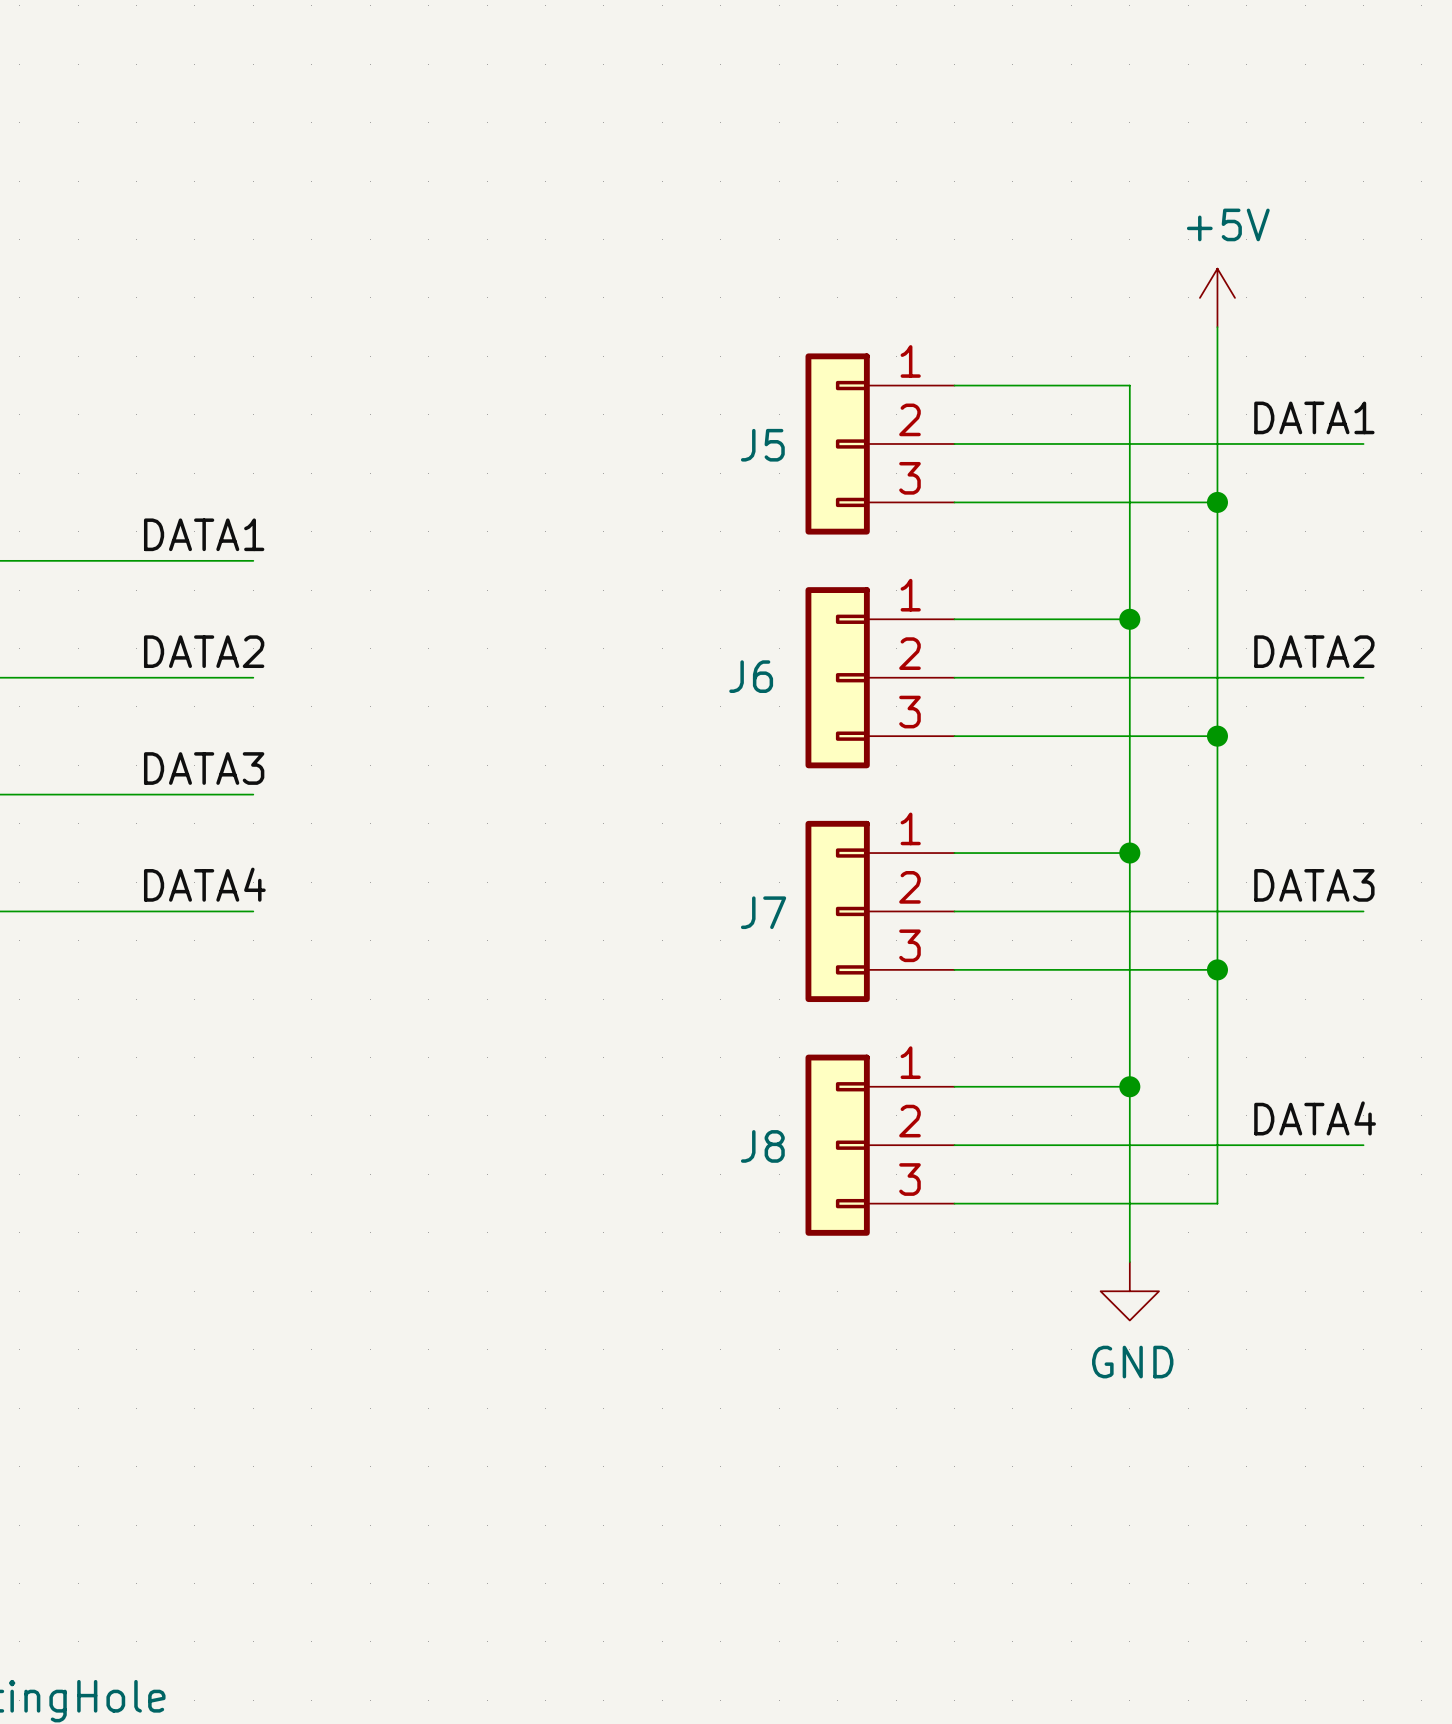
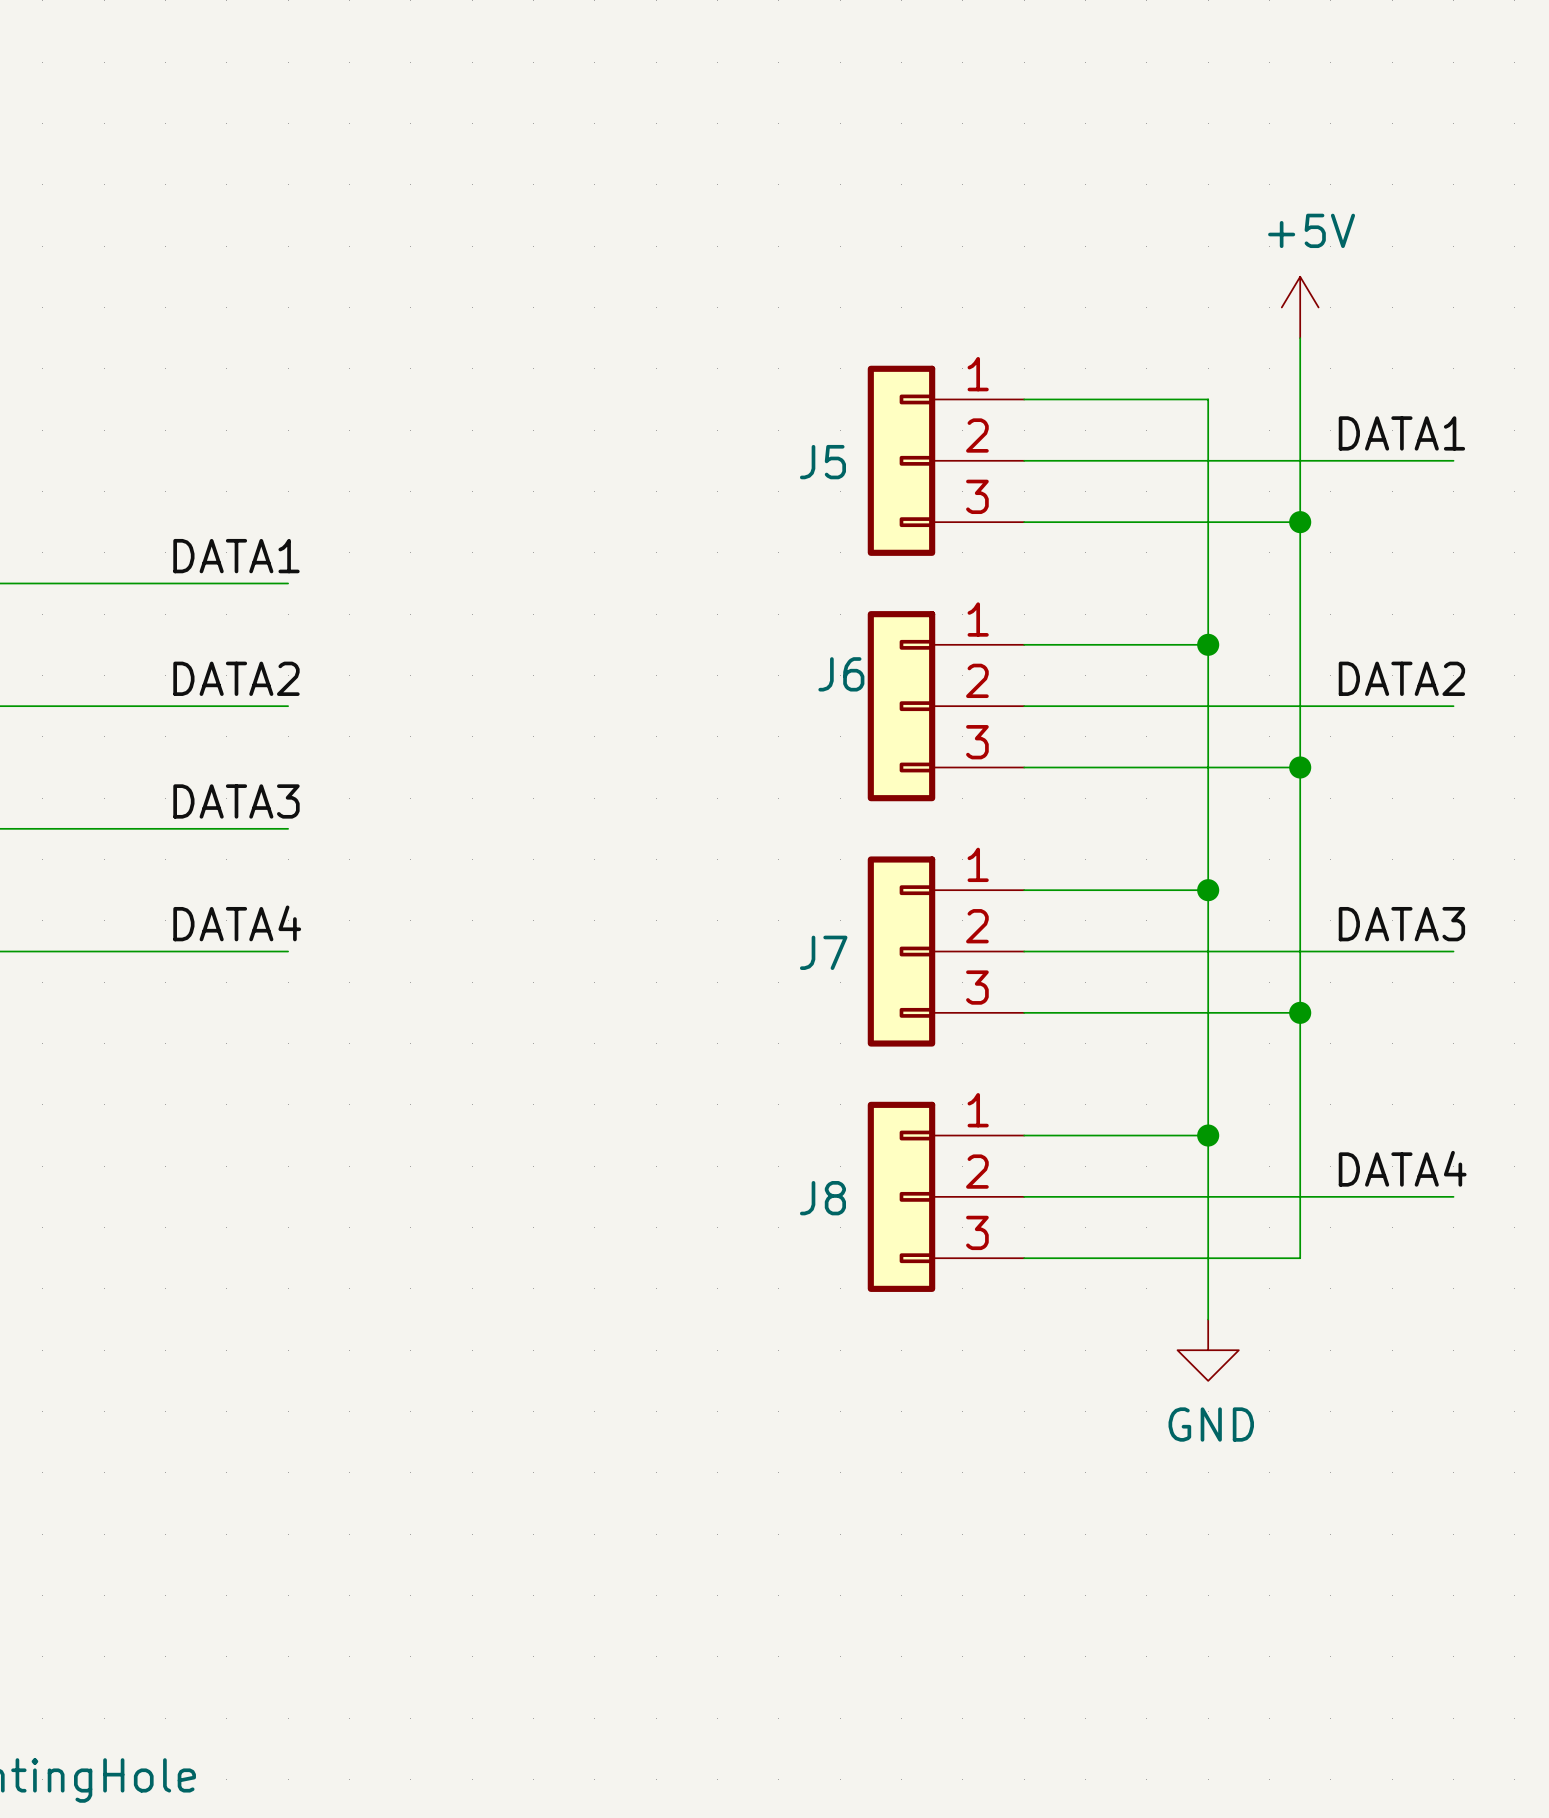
J6 name position: J6 (751, 676) -> J6 (841, 674)

